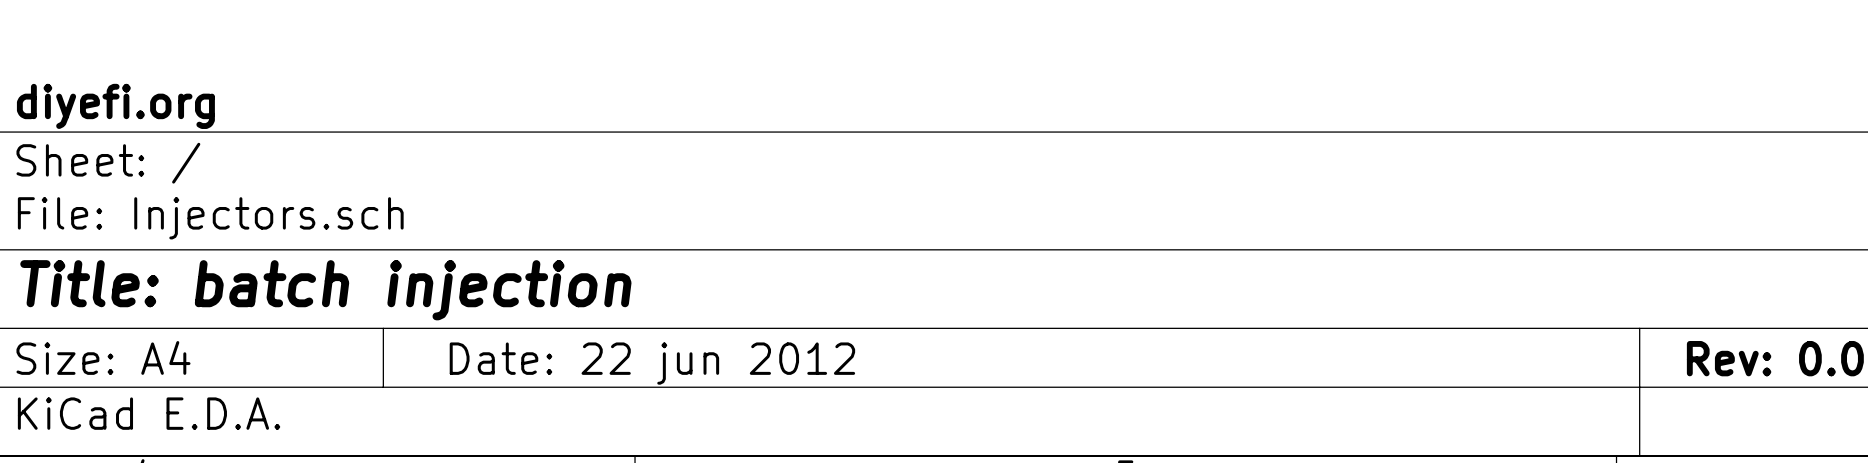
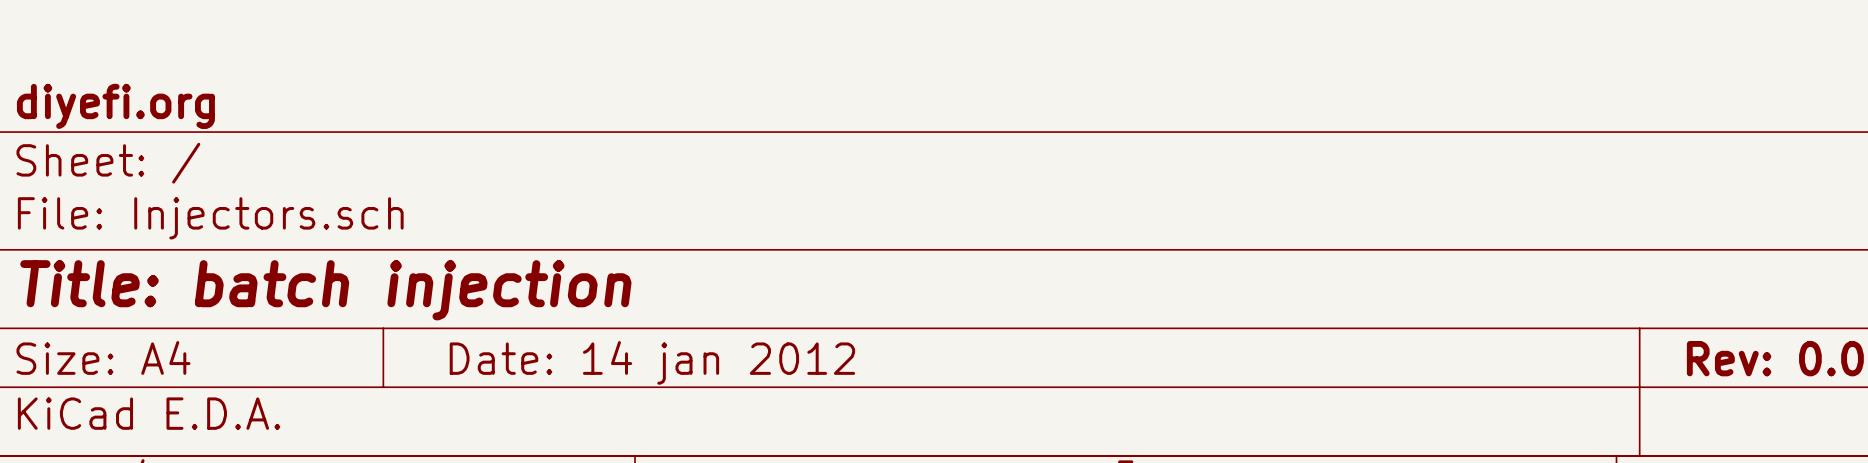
title block: Date: 22 jun 2012 (652, 363) -> Date: 14 jan 2012 (652, 362)

